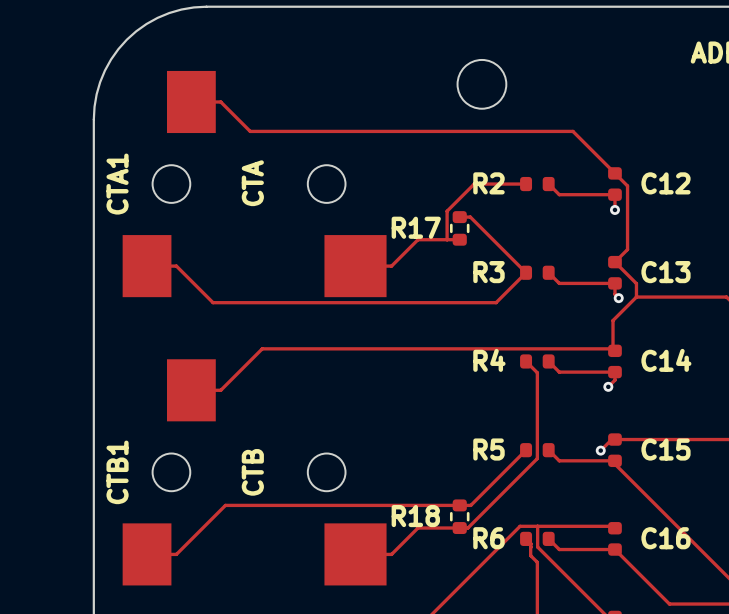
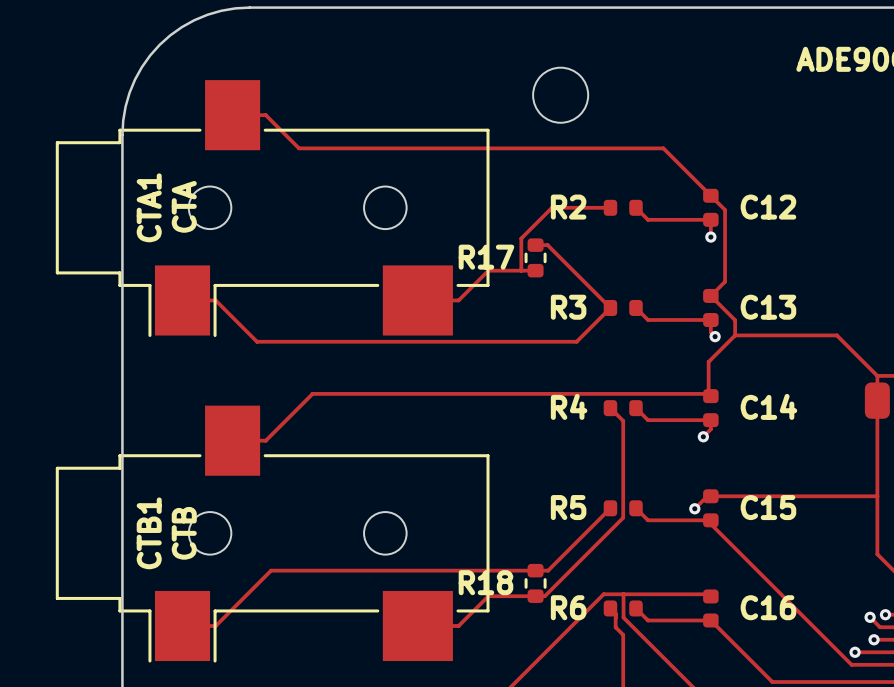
CTA1 footprint: [122, 70, 387, 298] -> [55, 80, 490, 338]
text position: CTA (252, 183) -> CTA (184, 206)
CTB1 footprint: [122, 359, 387, 586] -> [55, 405, 490, 663]
text position: CTB (252, 472) -> CTB (184, 533)

